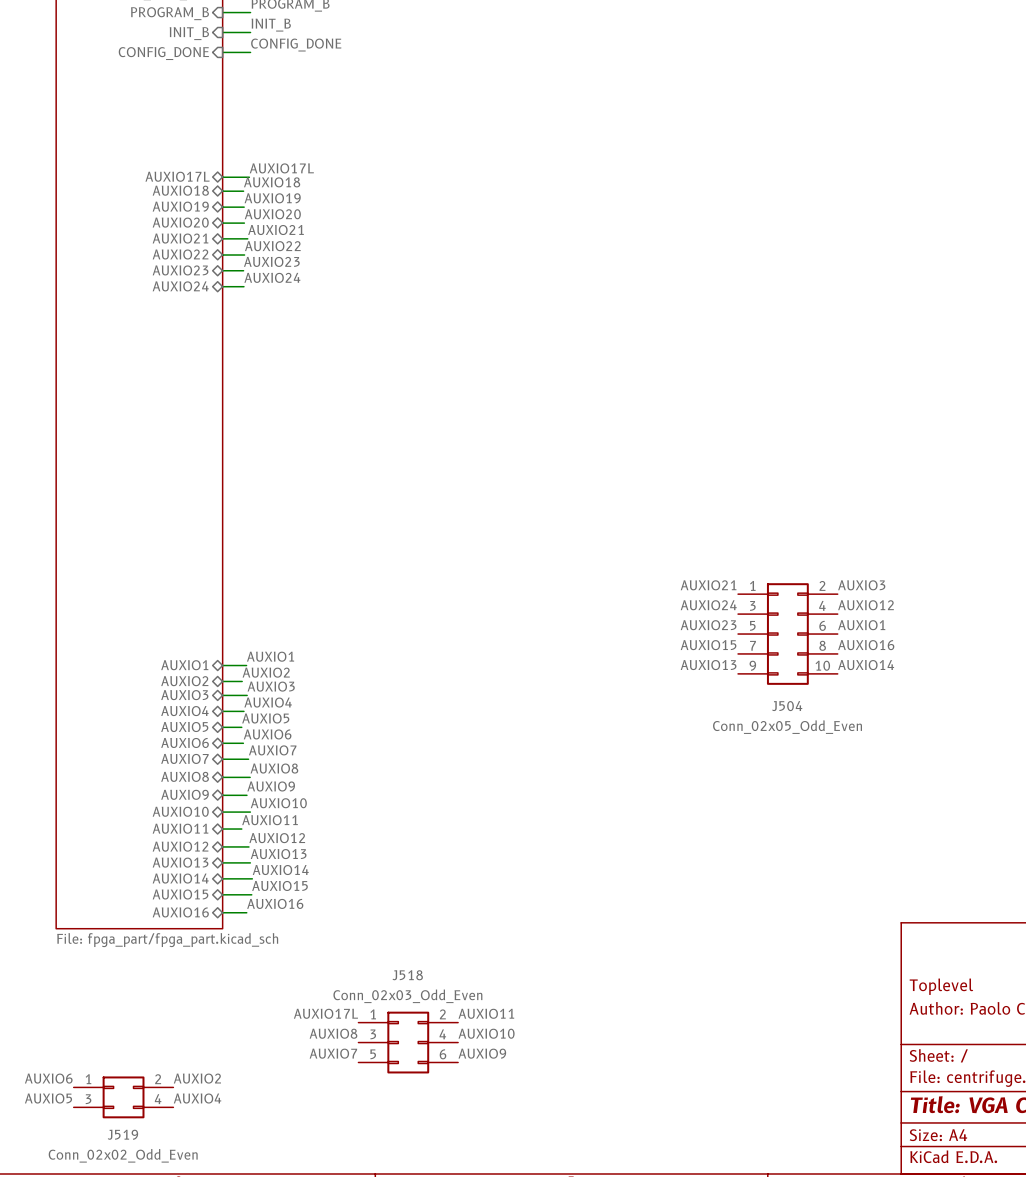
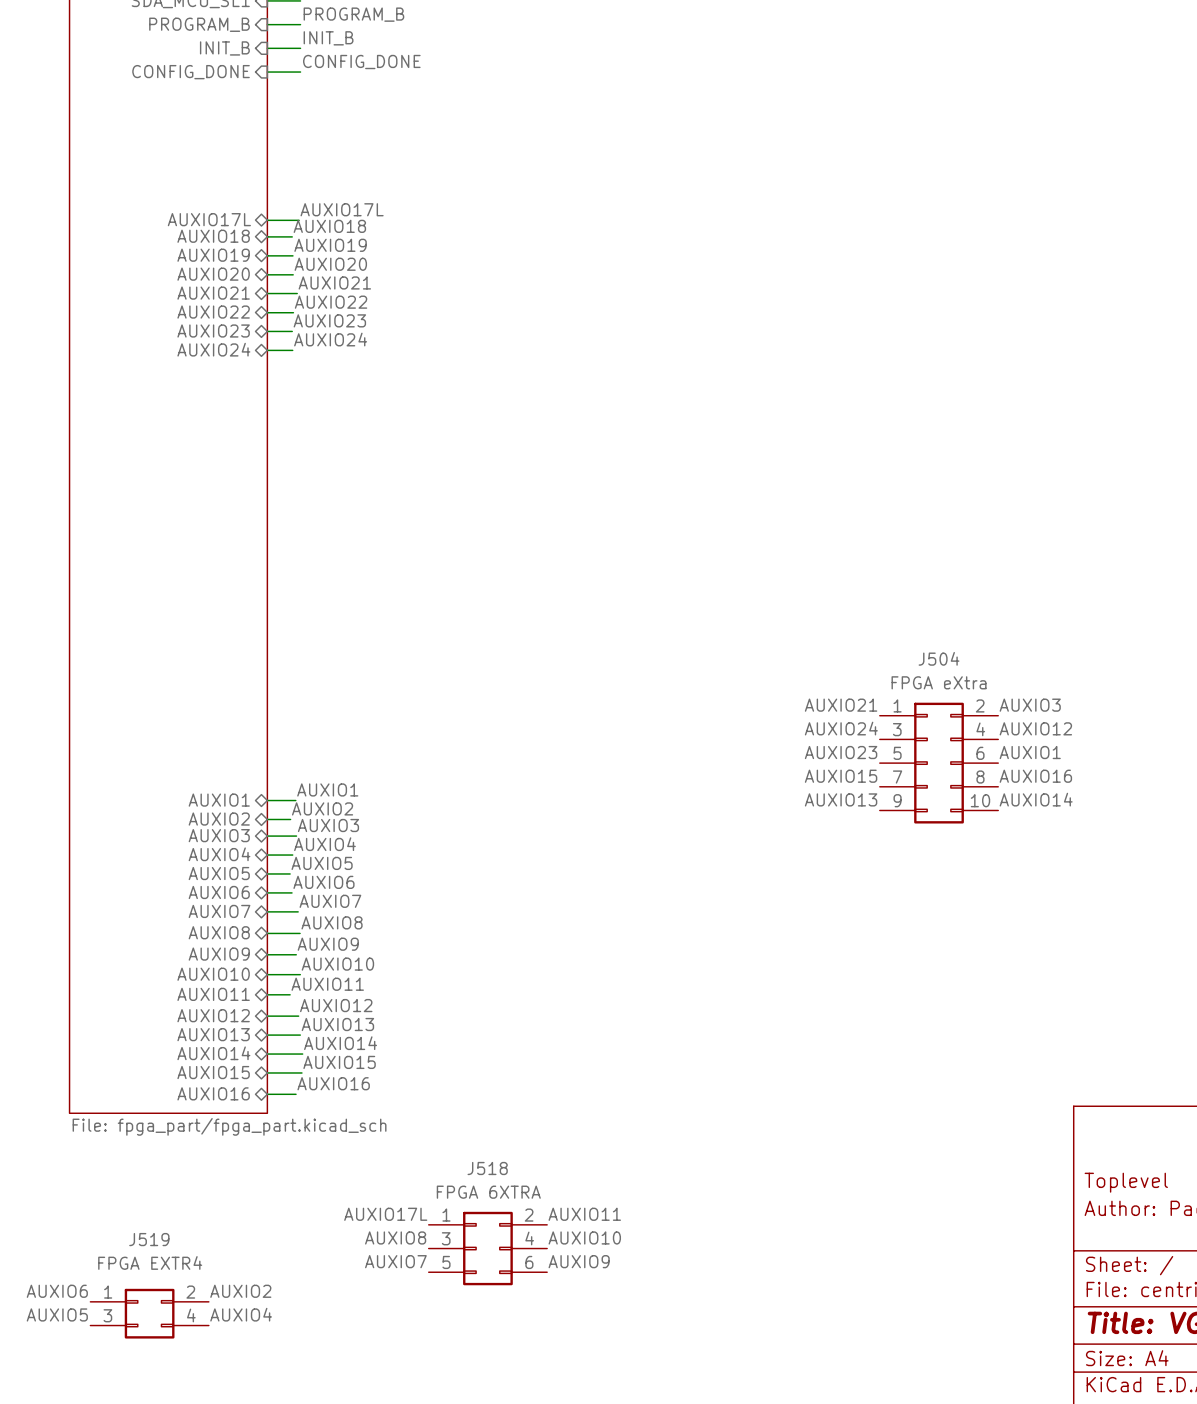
J504 name position: J504 (787, 706) -> J504 (939, 658)
J504 value: Conn_02x05_Odd_Even (787, 727) -> FPGA eXtra (939, 682)
J518 value: Conn_02x03_Odd_Even (407, 996) -> FPGA 6XTRA (488, 1192)
J519 name position: J519 (122, 1134) -> J519 (149, 1239)
J519 value: Conn_02x02_Odd_Even (123, 1155) -> FPGA EXTR4 (150, 1262)

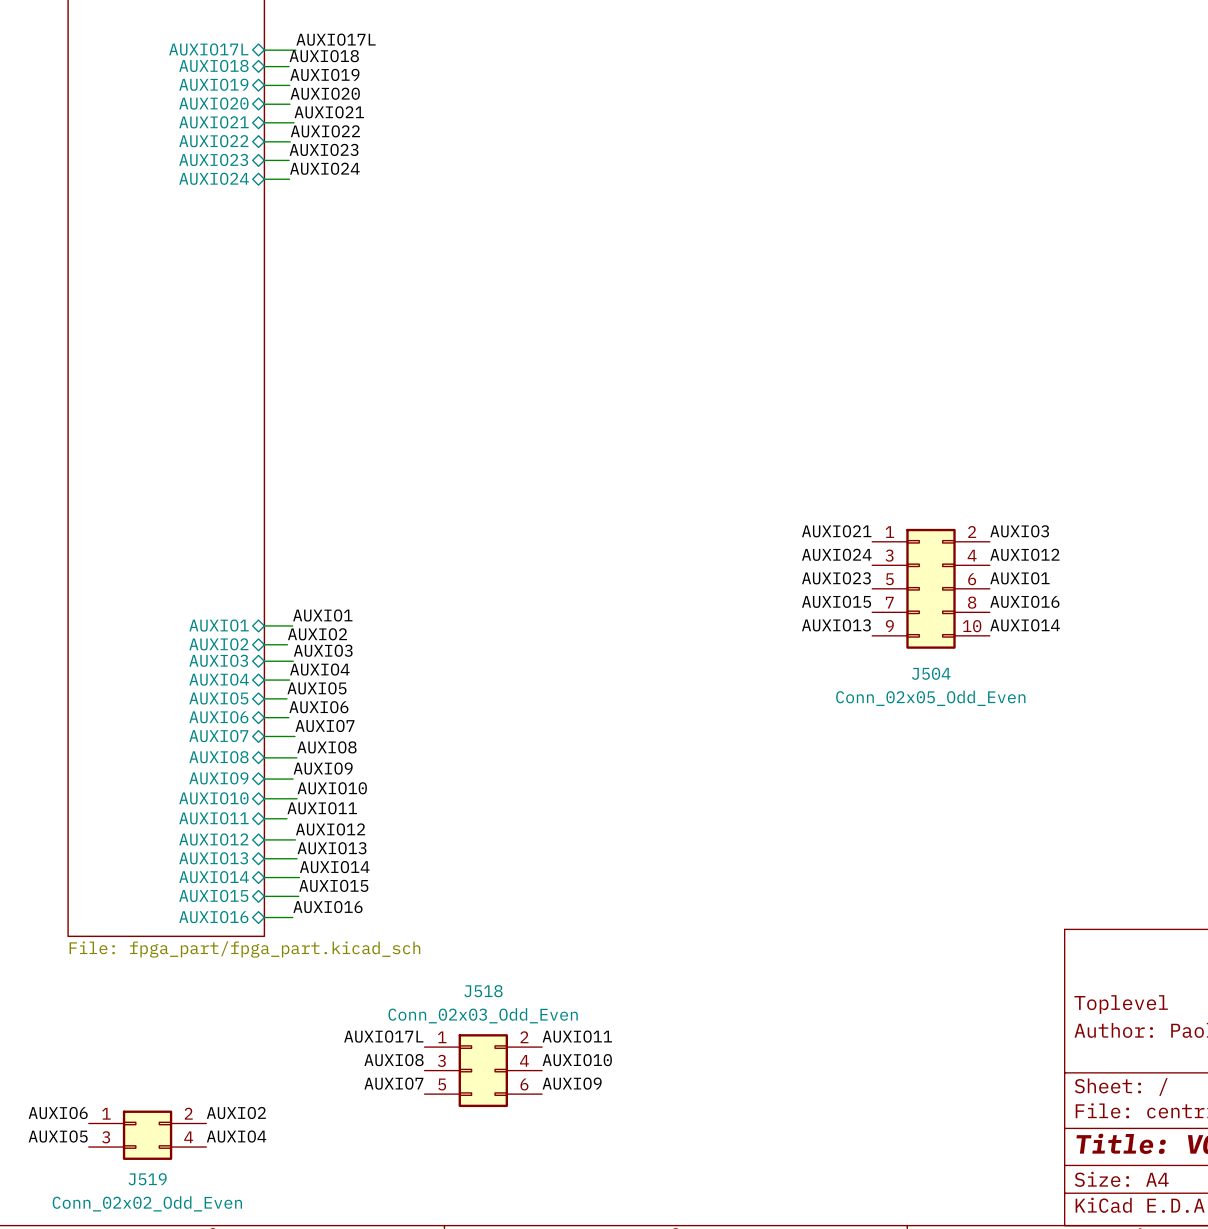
J504 name position: J504 (939, 658) -> J504 (931, 673)
J504 value: FPGA eXtra (939, 682) -> Conn_02x05_Odd_Even (930, 698)
J518 value: FPGA 6XTRA (488, 1192) -> Conn_02x03_Odd_Even (483, 1015)
J519 name position: J519 (149, 1239) -> J519 (147, 1179)
J519 value: FPGA EXTR4 (150, 1262) -> Conn_02x02_Odd_Even (147, 1203)

